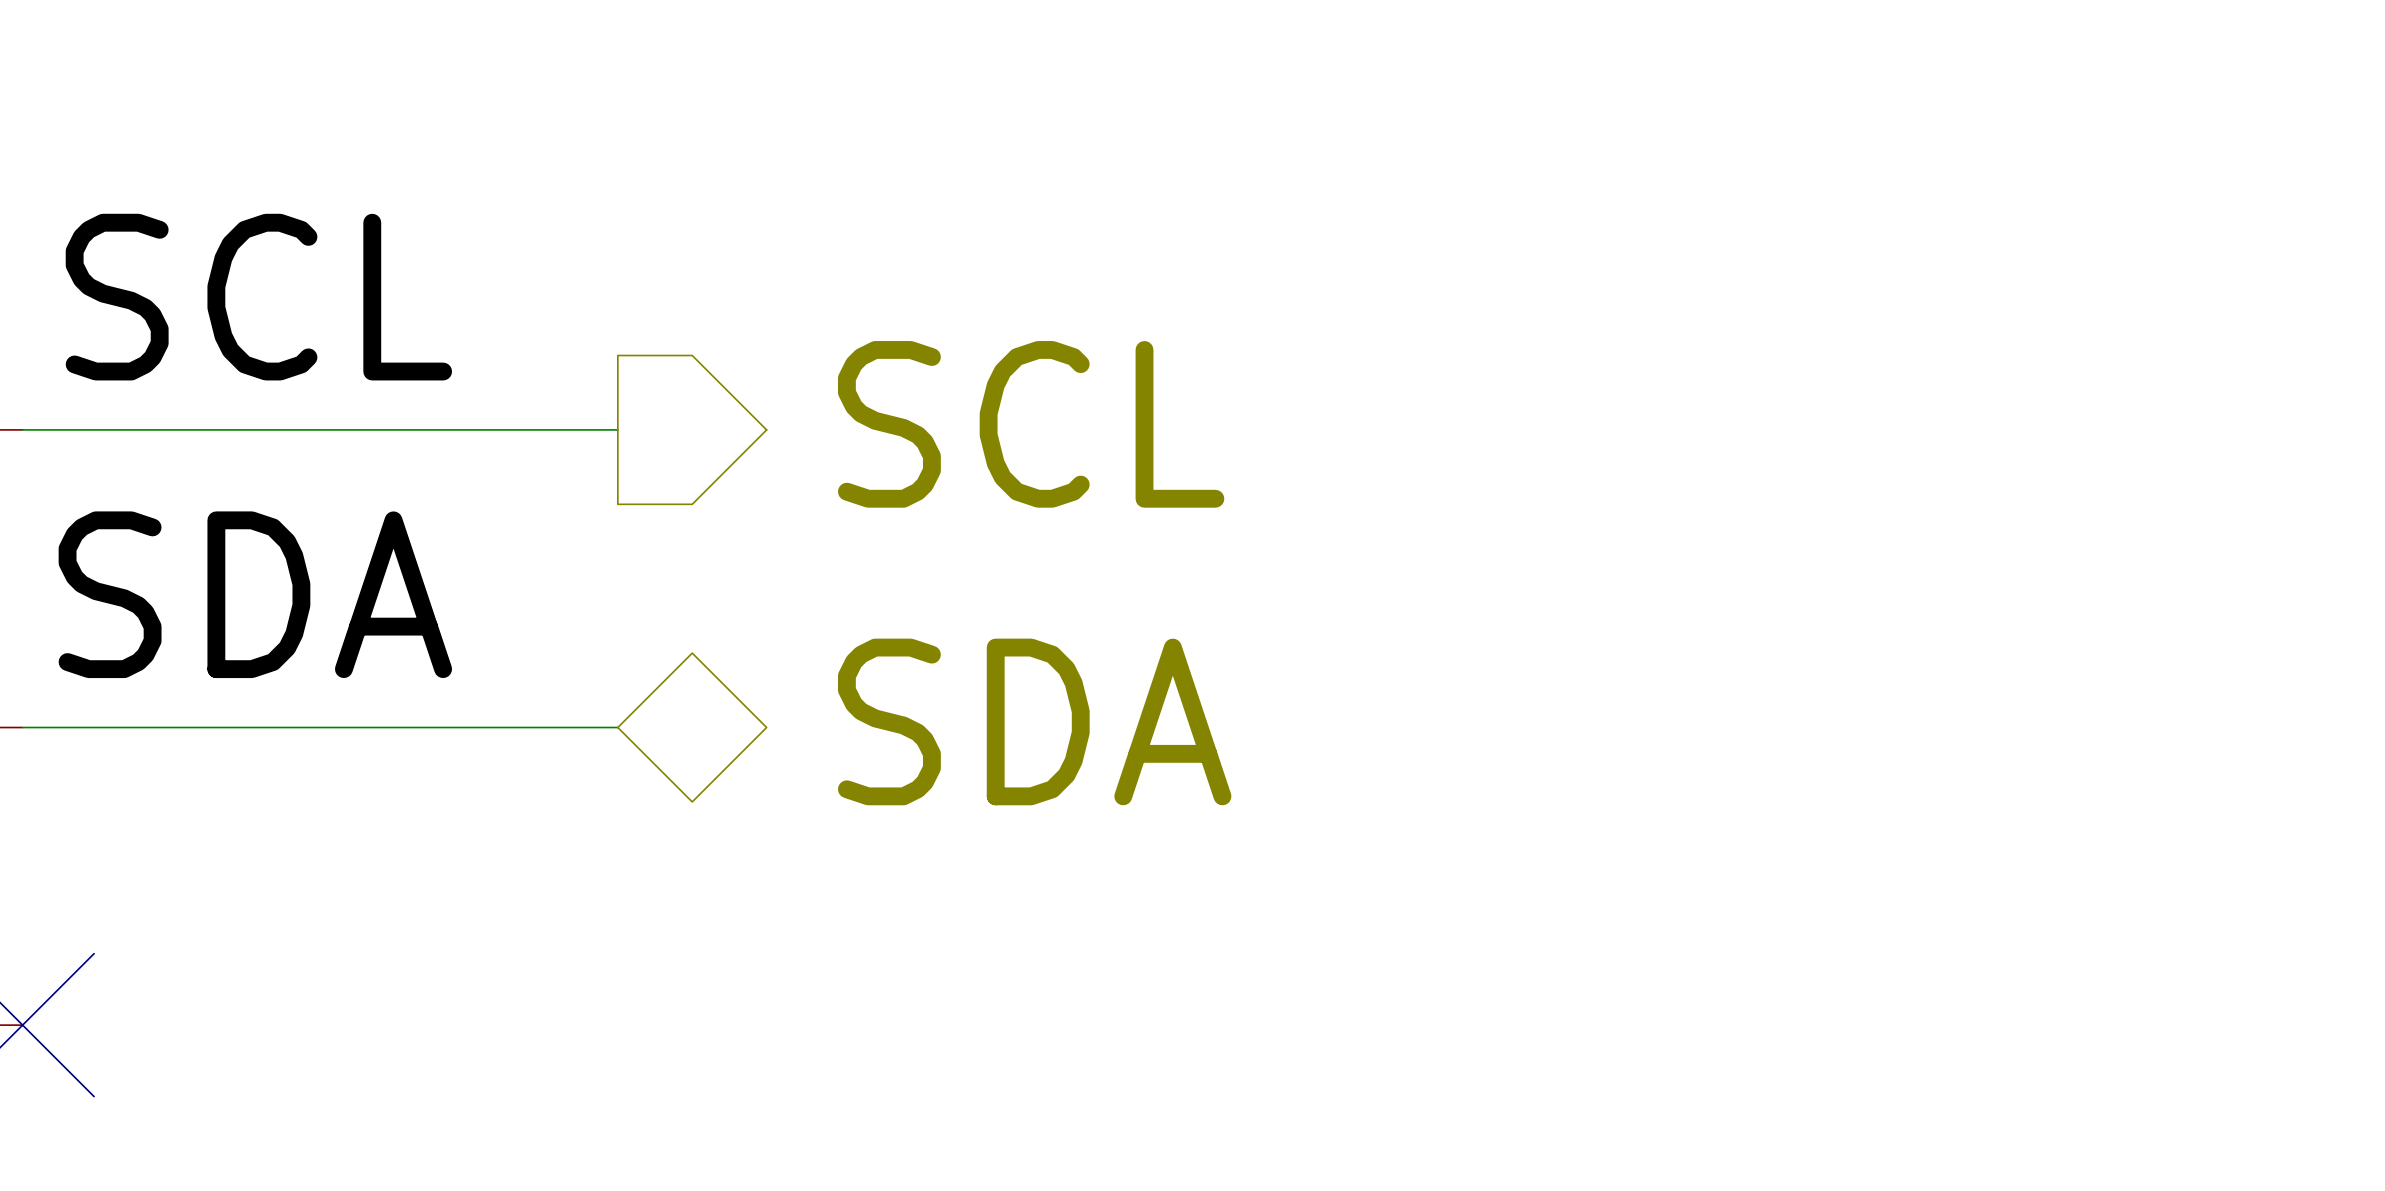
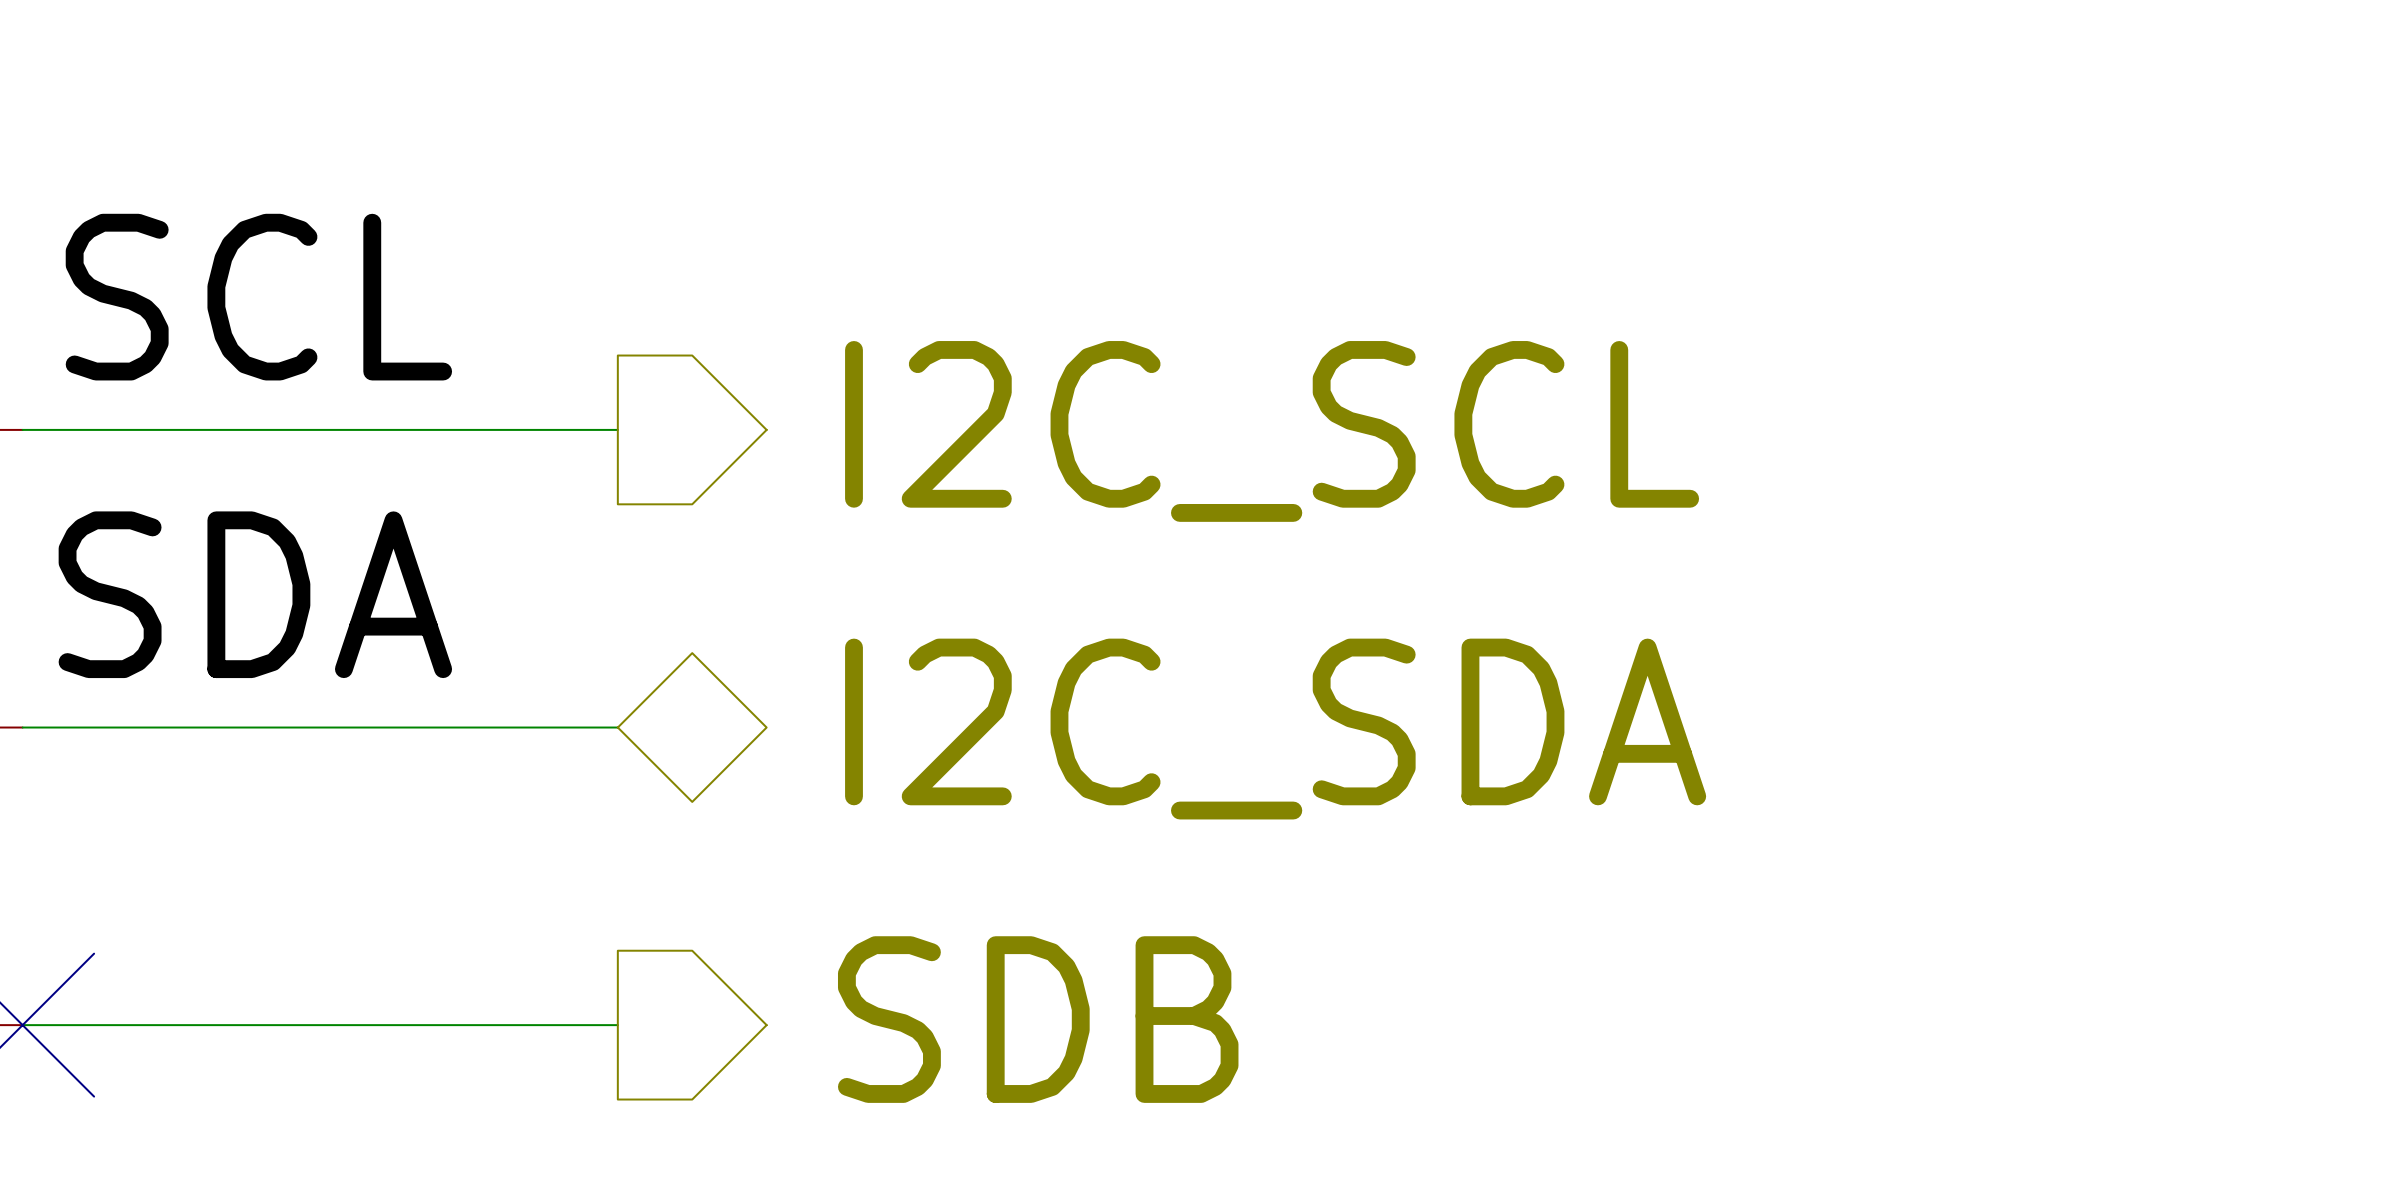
hierarchical label: SCL (1031, 424) -> I2C_SCL (1272, 431)
hierarchical label: SDA (1034, 721) -> I2C_SDA (1275, 729)
hierarchical label: none -> SDB (1038, 1019)
wire: none -> (22, 1025) (617, 1025)

